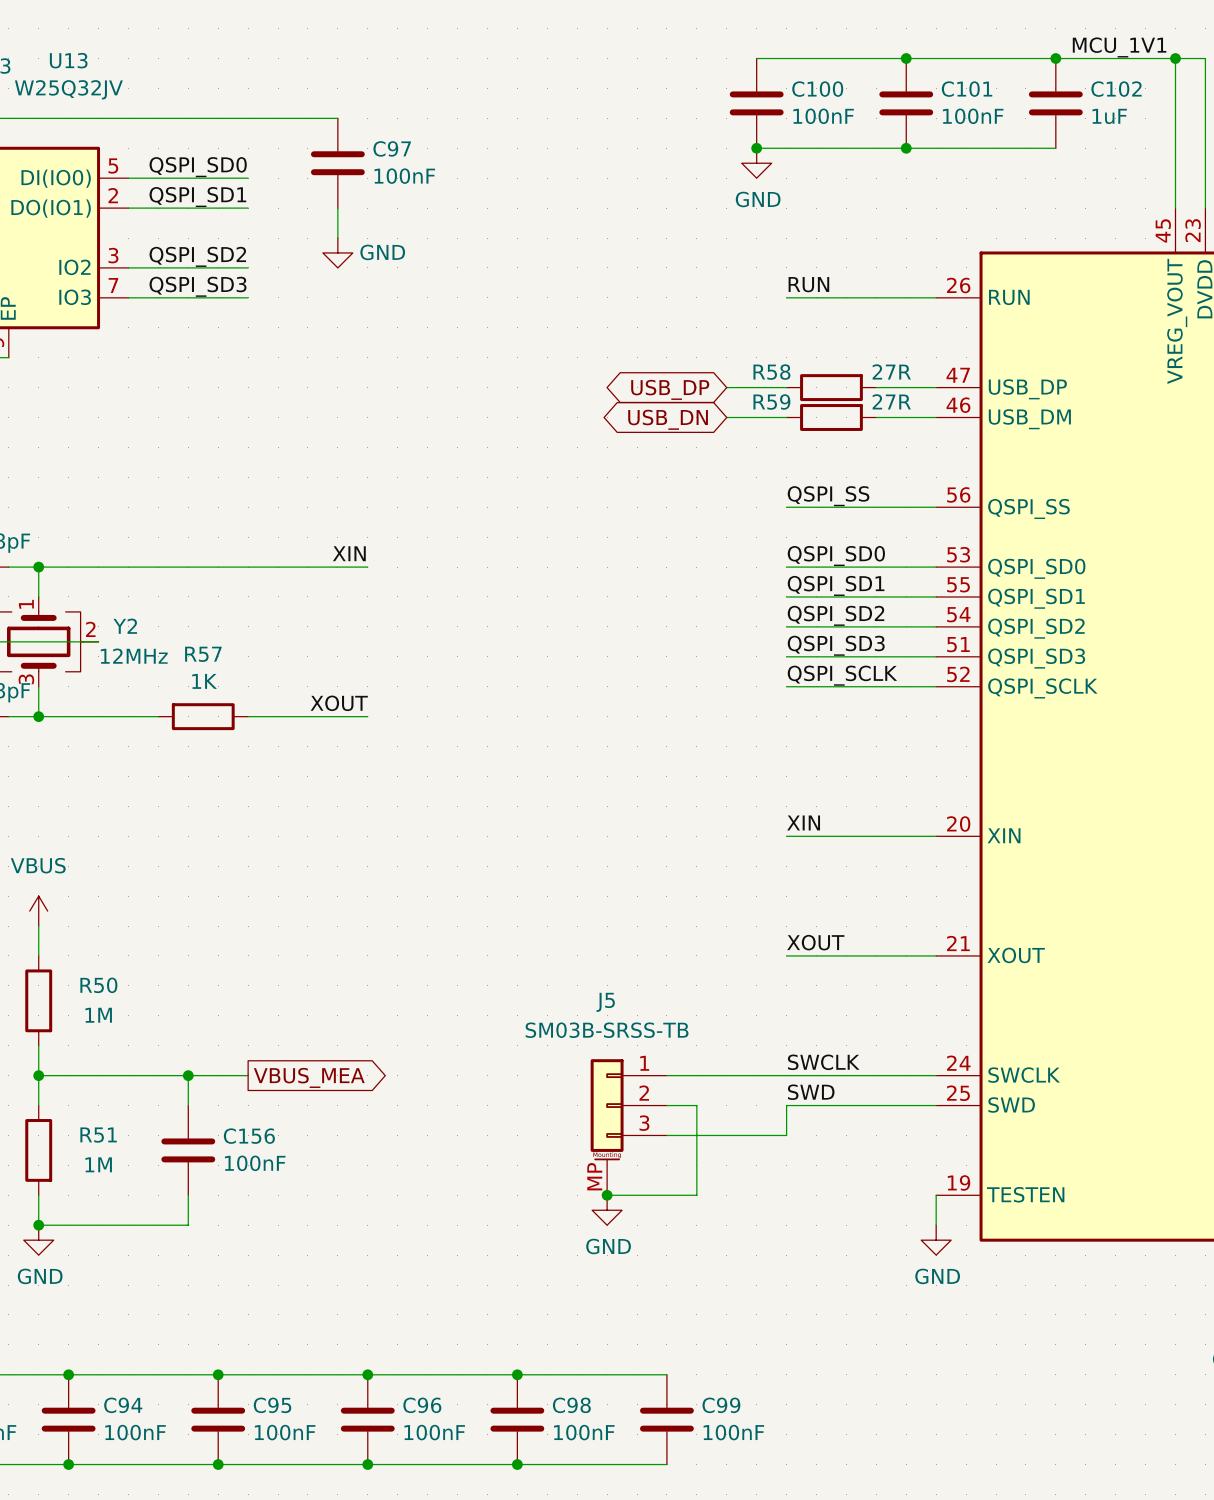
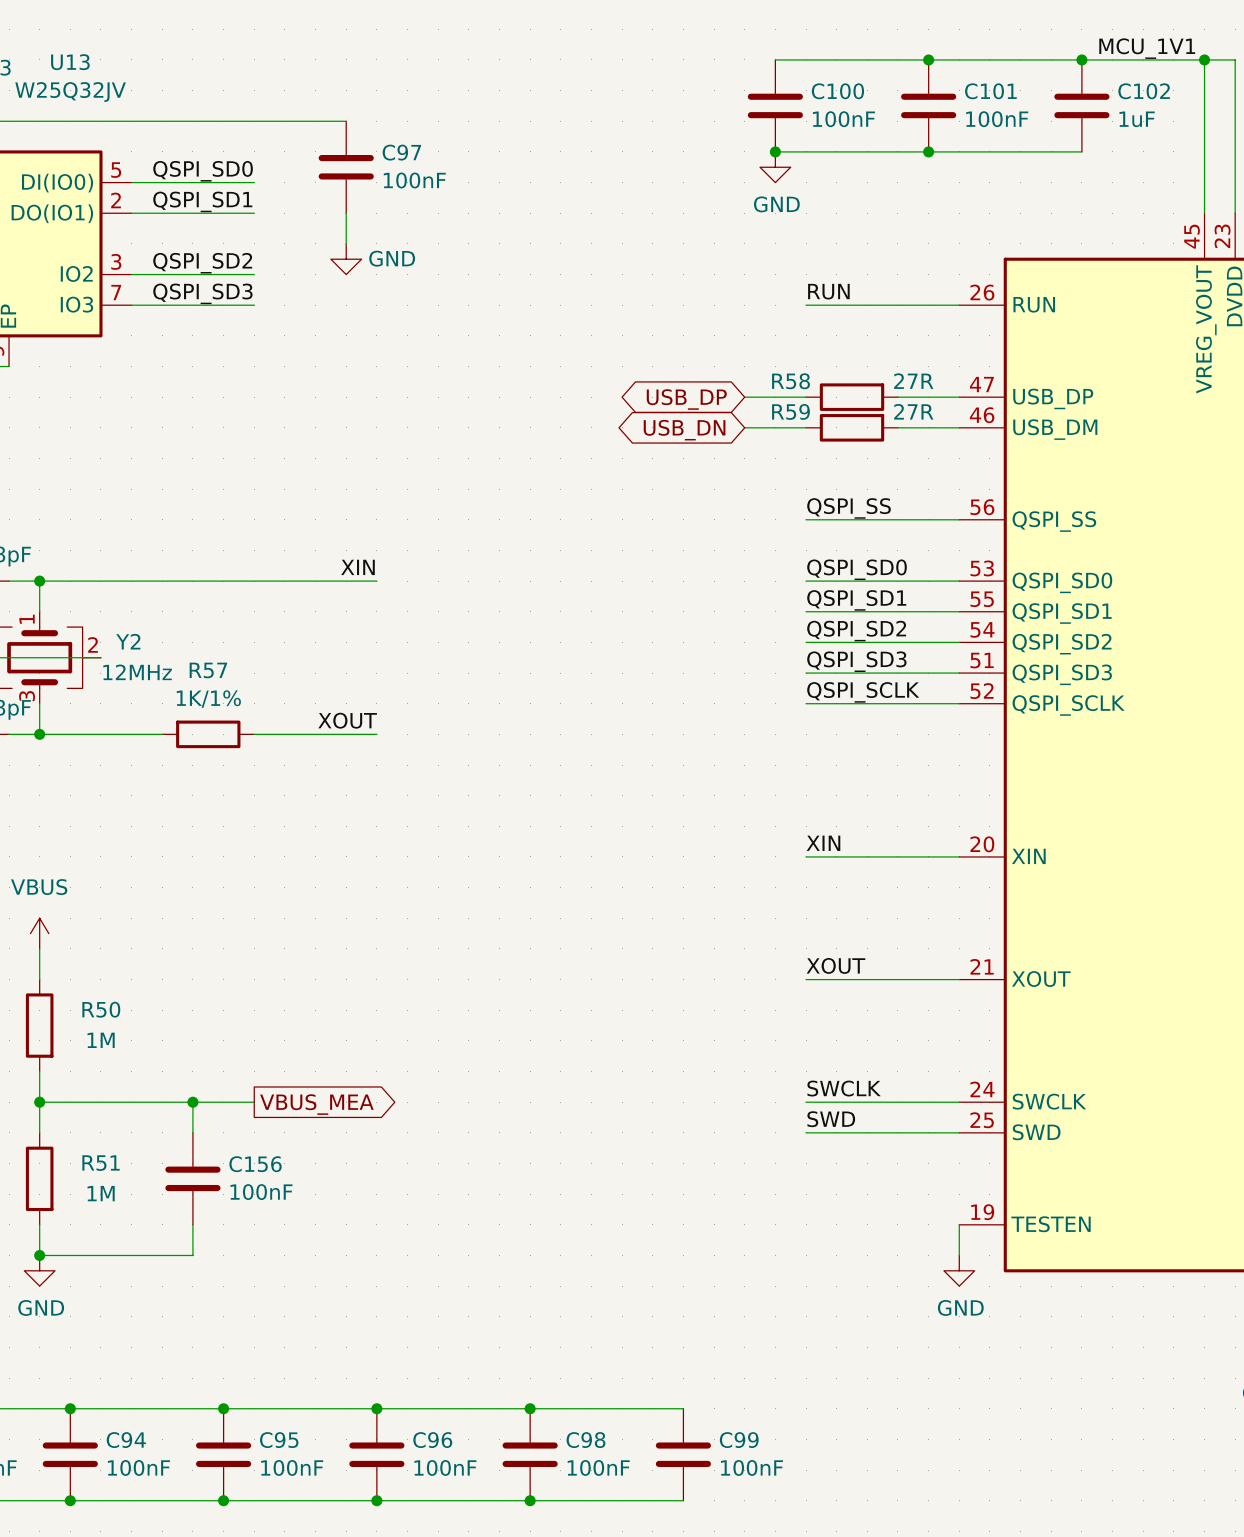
R57 value: 1K (204, 681) -> 1K/1% (208, 699)
wire: (666, 1075) (786, 1075) -> none
wire: (666, 1105) (696, 1105) (696, 1195) (607, 1195) -> none
wire: (786, 1105) (786, 1135) (666, 1135) -> none
J5: SM03B-SRSS-TB (628, 1127) -> none
junction: (607, 1195) -> none
power symbol: GND (607, 1210) -> none

